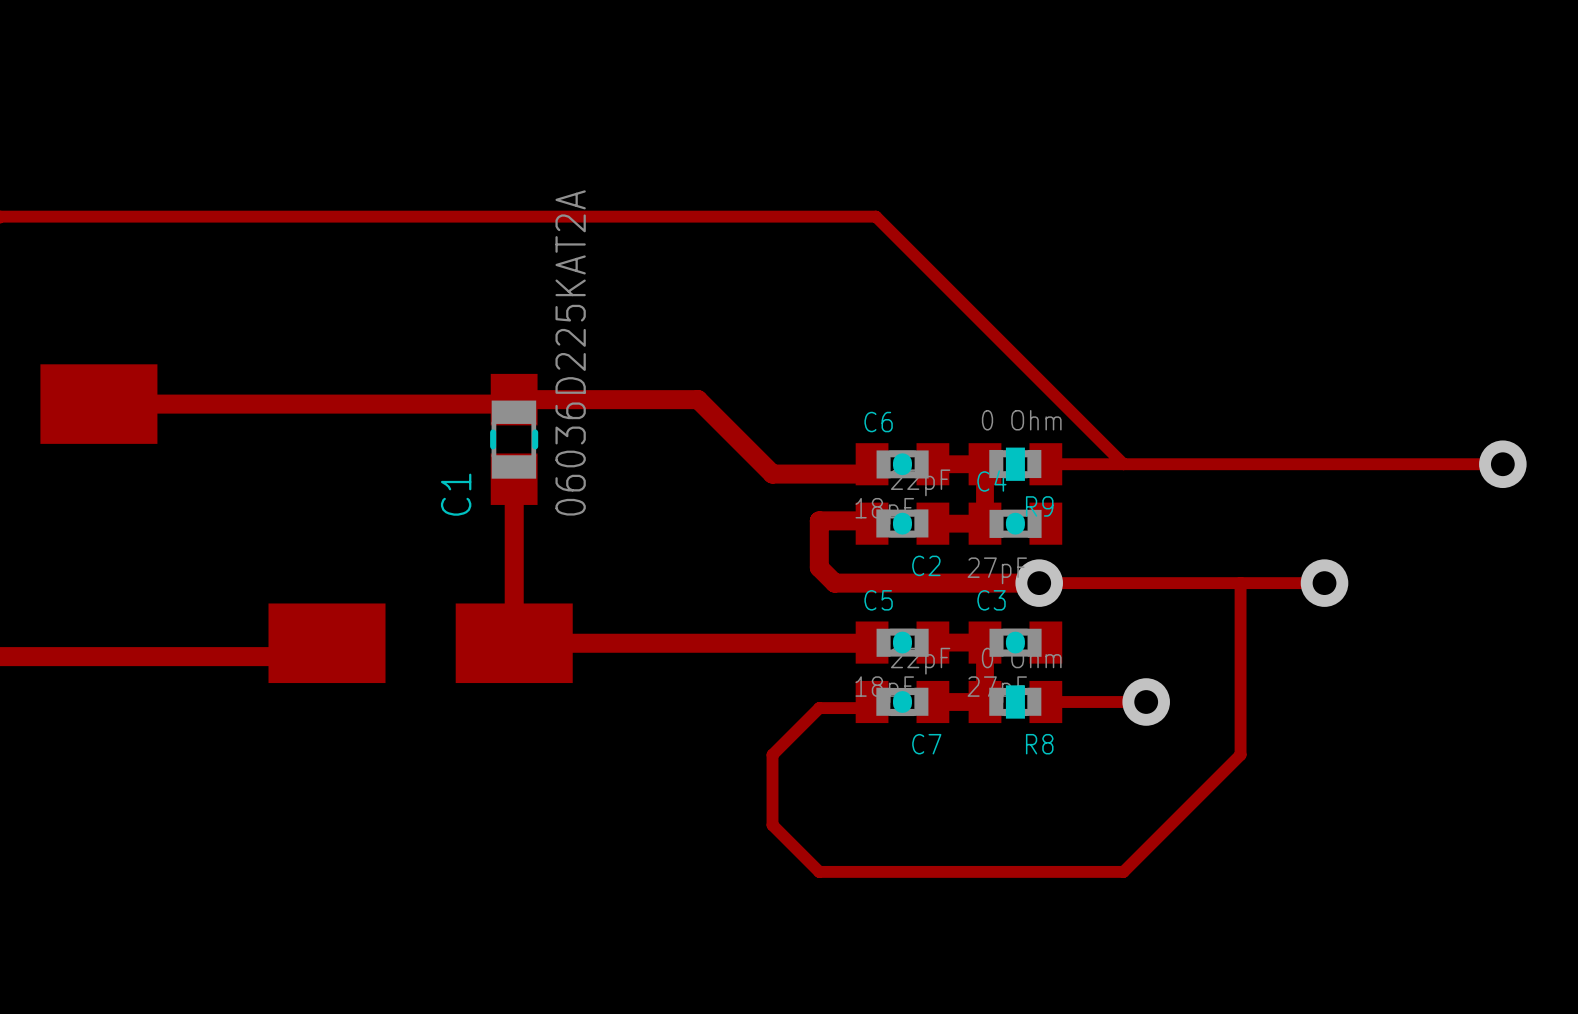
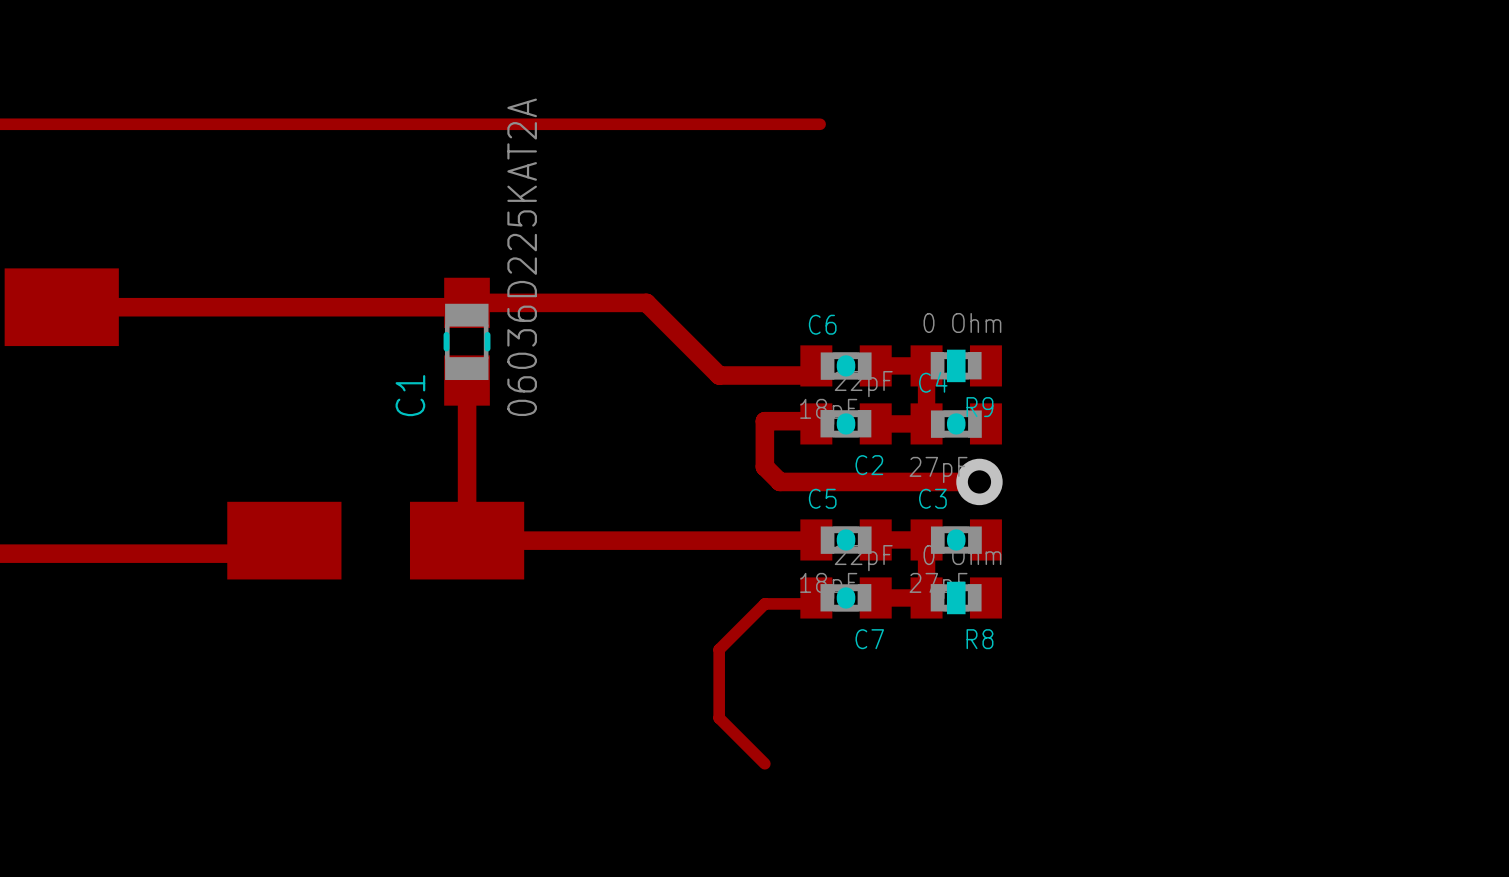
track: (875, 216) (1123, 464) -> none
track: (1045, 464) (1502, 464) -> none
via: (1502, 464) -> none
track: (1039, 583) (1324, 583) -> none
track: (1240, 583) (1240, 754) (1123, 871) (819, 871) -> none
via: (1324, 583) -> none
track: (1045, 702) (1146, 702) -> none
via: (1146, 702) -> none

